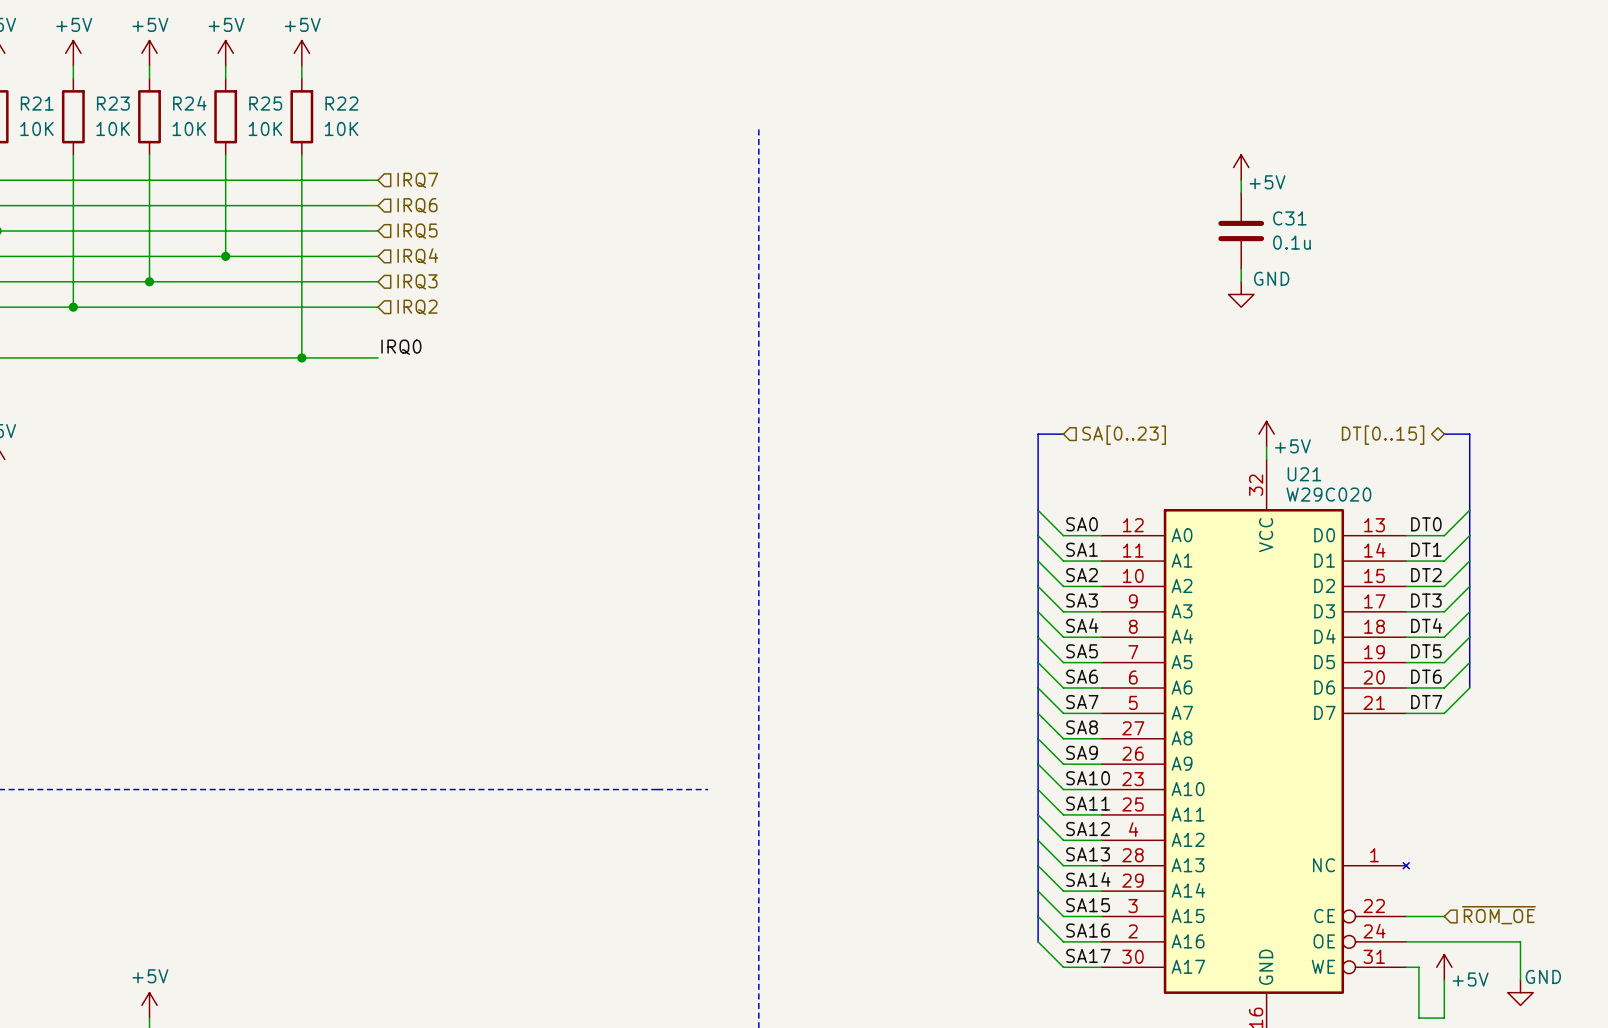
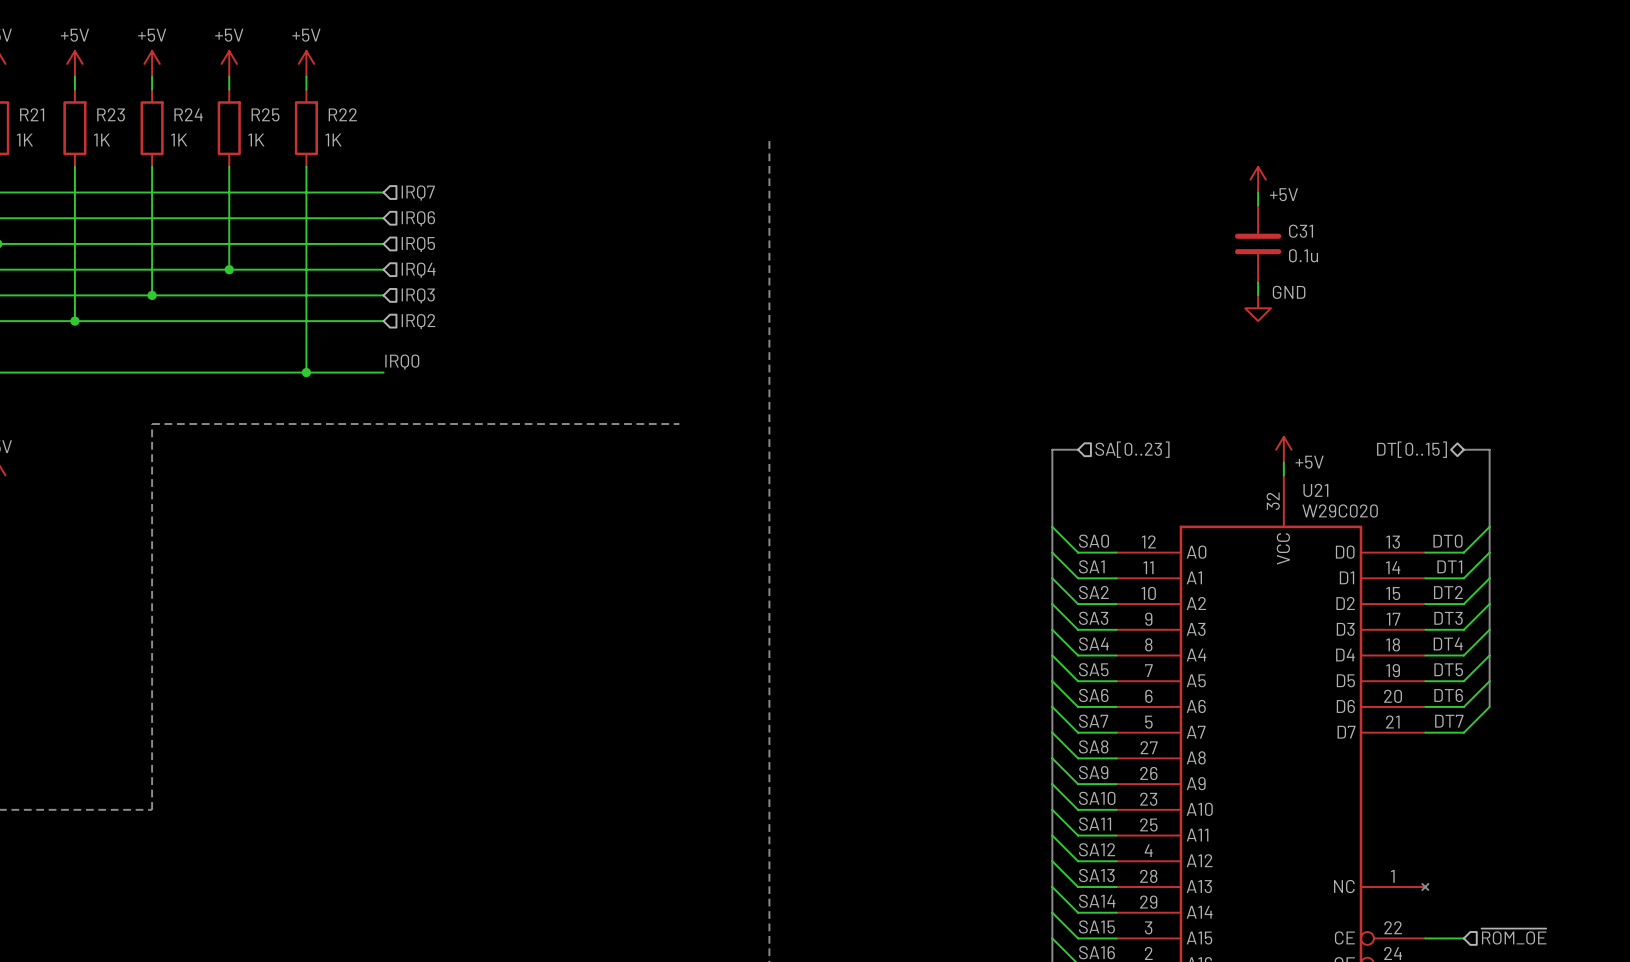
R21 value: 10K (36, 128) -> 1K (24, 140)
R23 value: 10K (113, 128) -> 1K (102, 140)
R24 value: 10K (189, 128) -> 1K (179, 140)
R25 value: 10K (265, 128) -> 1K (256, 140)
R22 value: 10K (341, 128) -> 1K (333, 140)
line: (149, 789) (708, 789) -> (152, 809) (152, 424) (679, 424)

